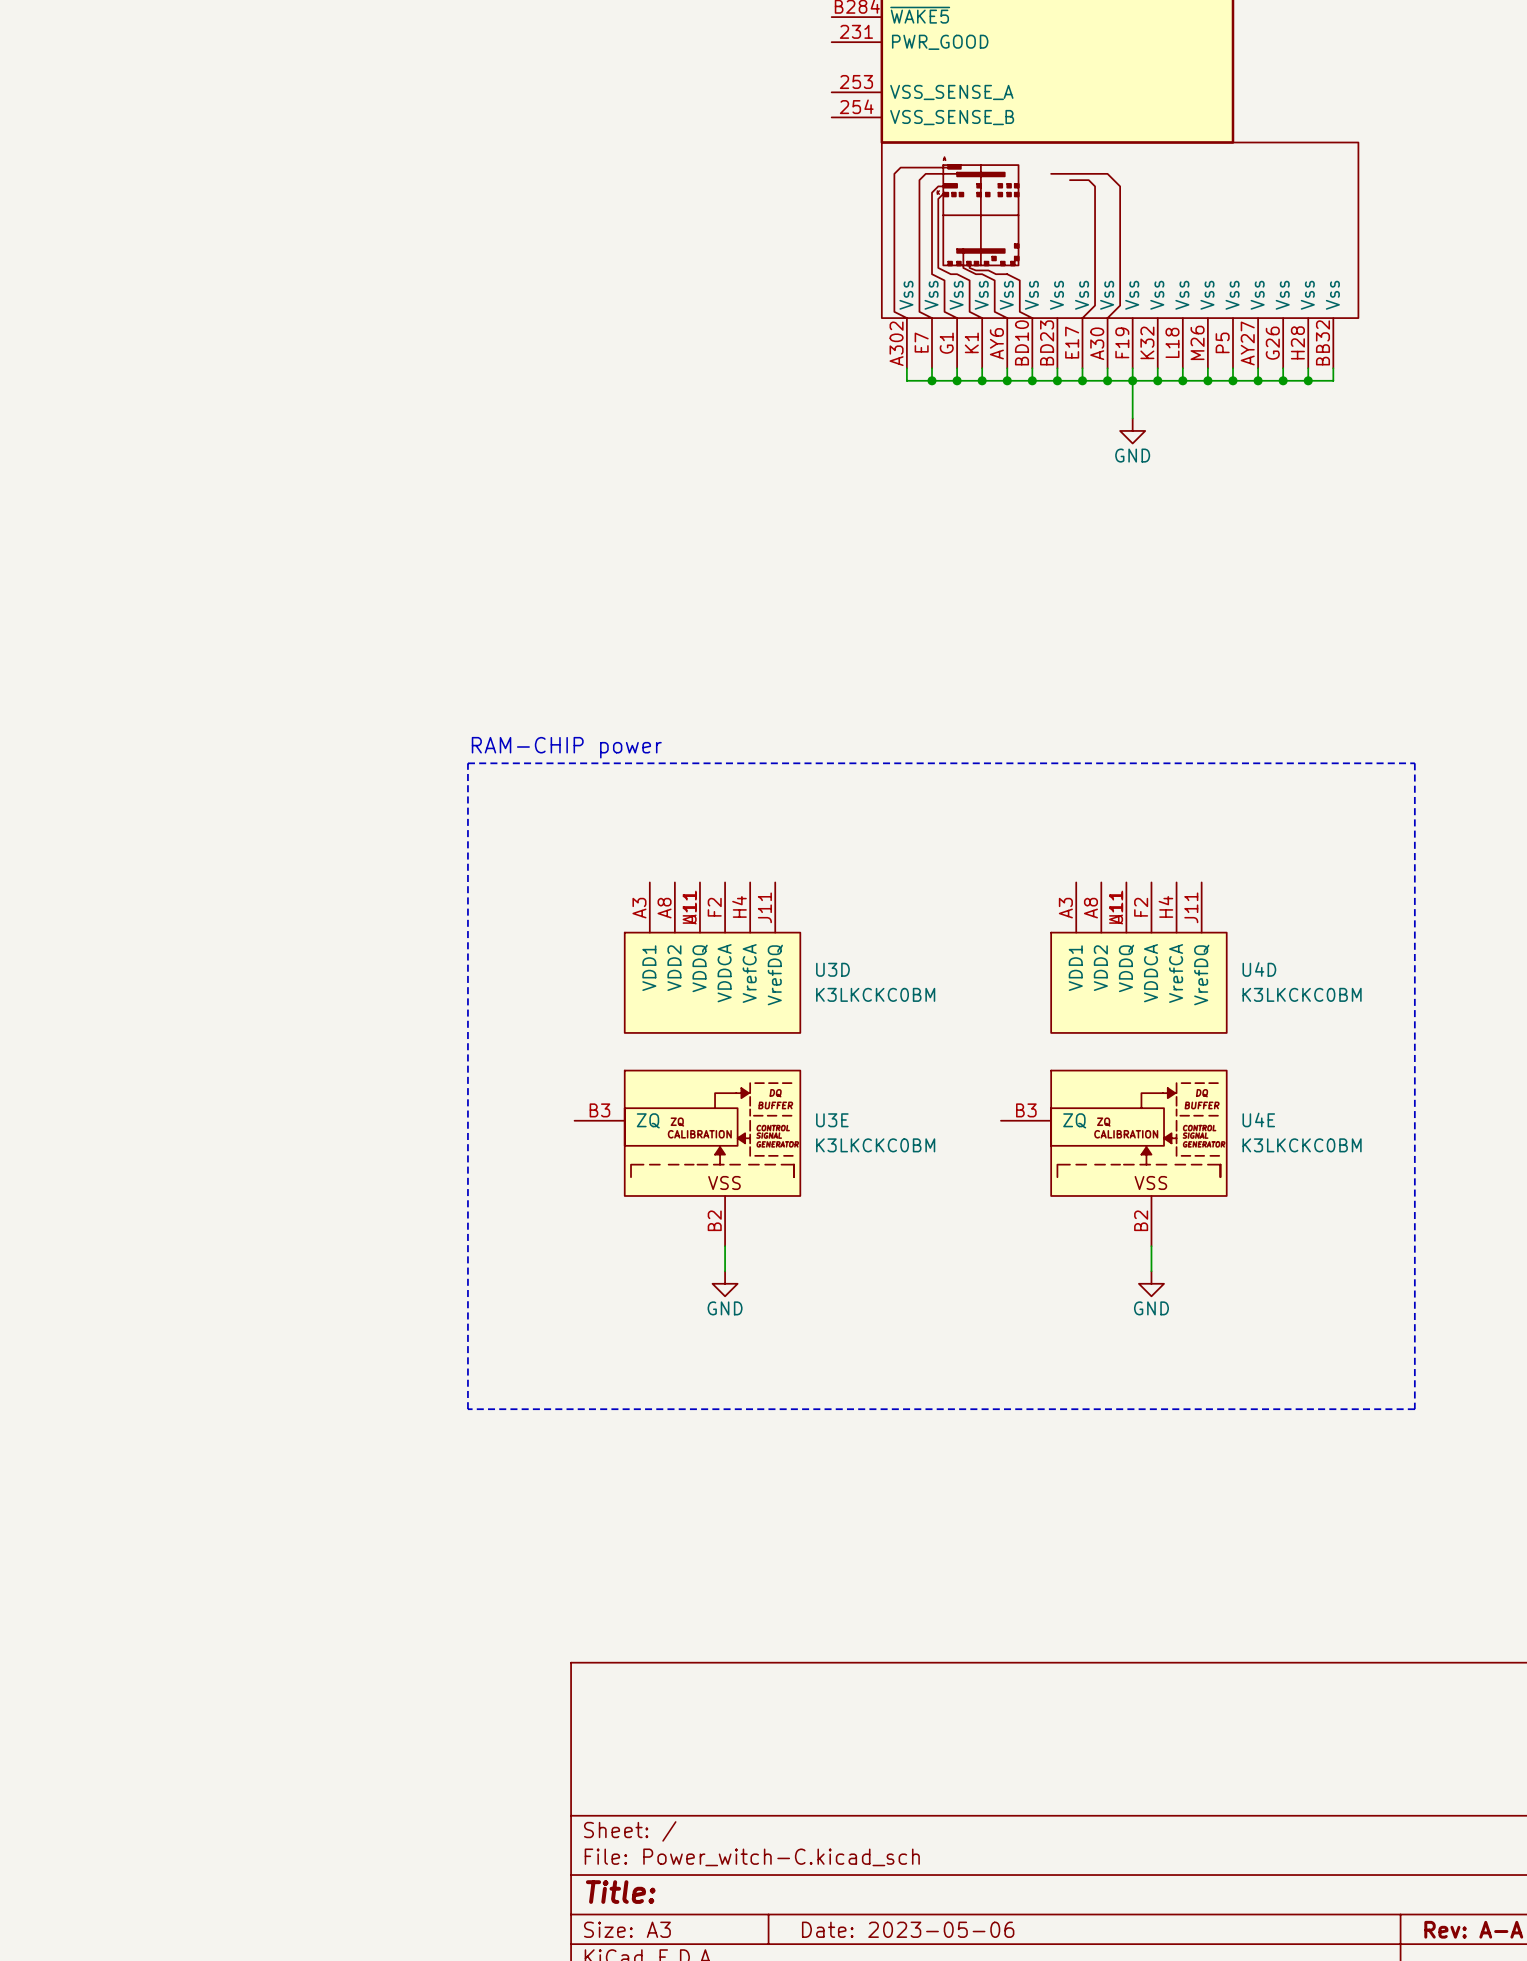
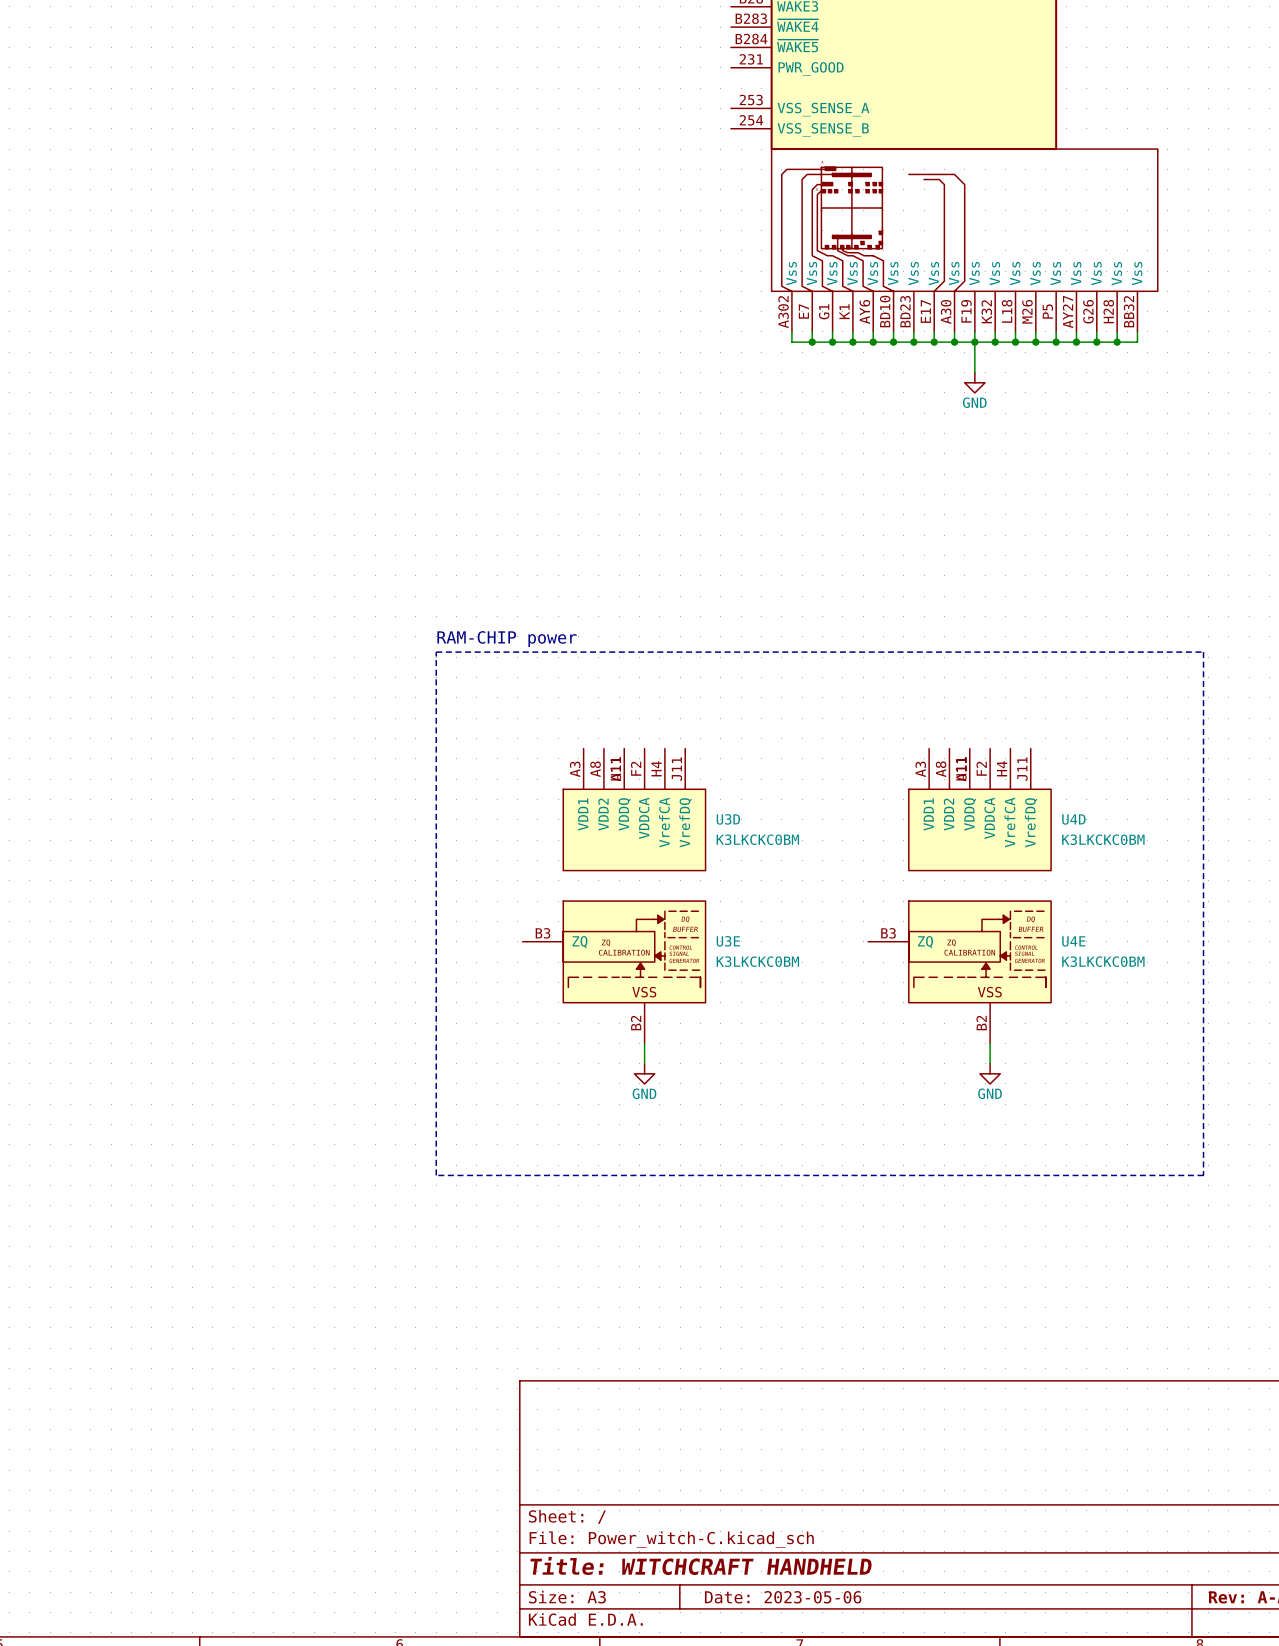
title block: Title: (620, 1892) -> Title: WITCHCRAFT HANDHELD (701, 1565)

